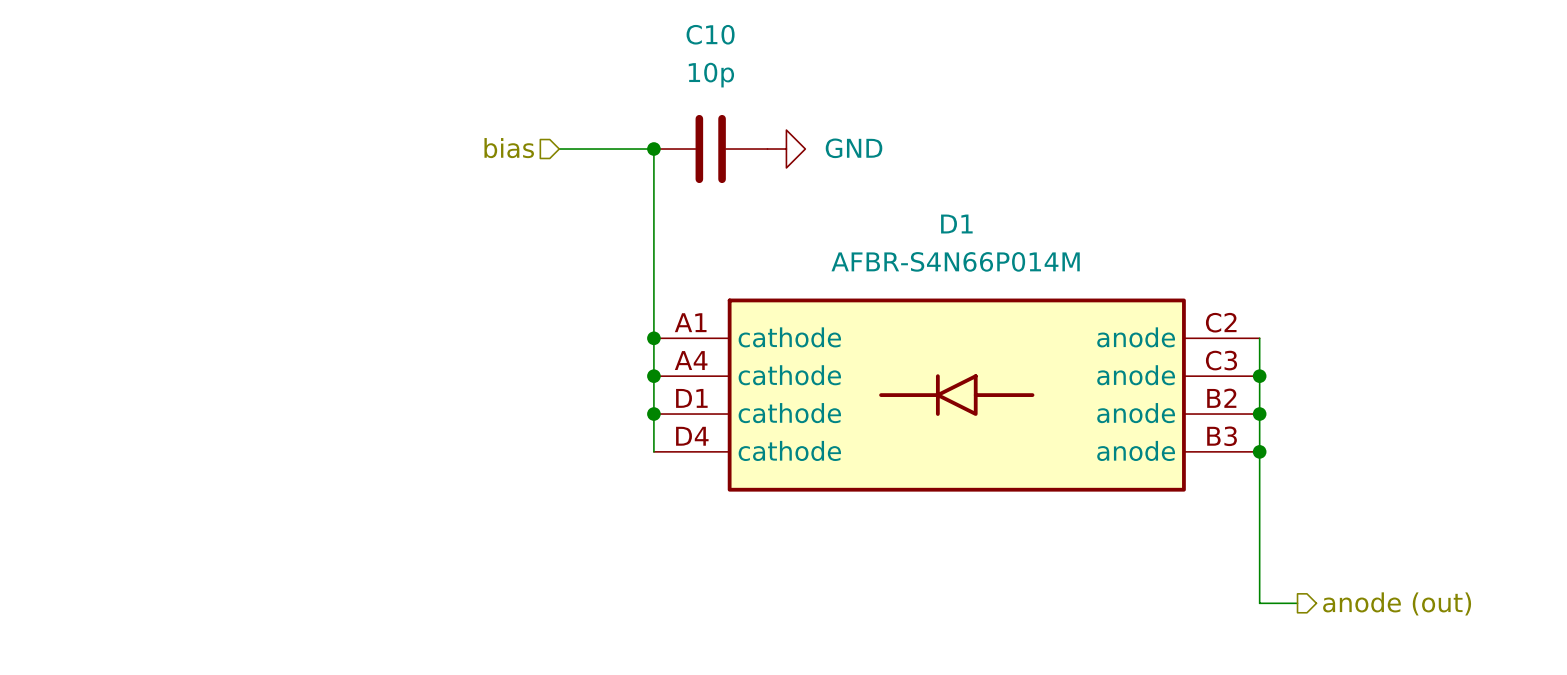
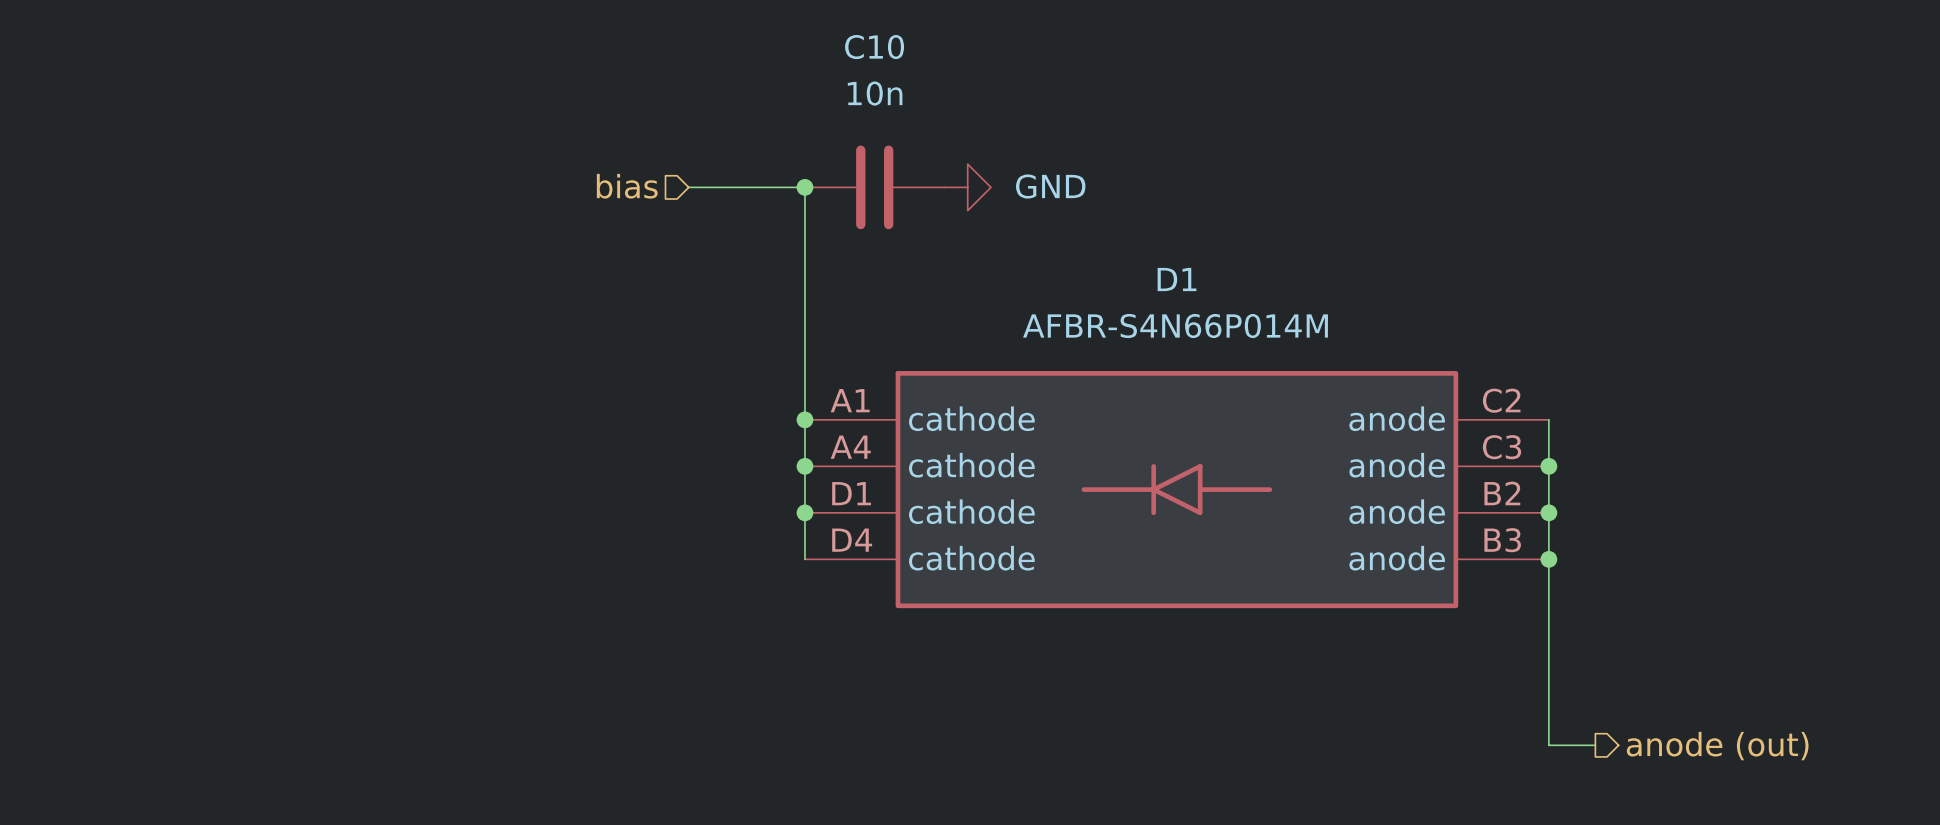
C10 value: 10p (711, 75) -> 10n (875, 93)

